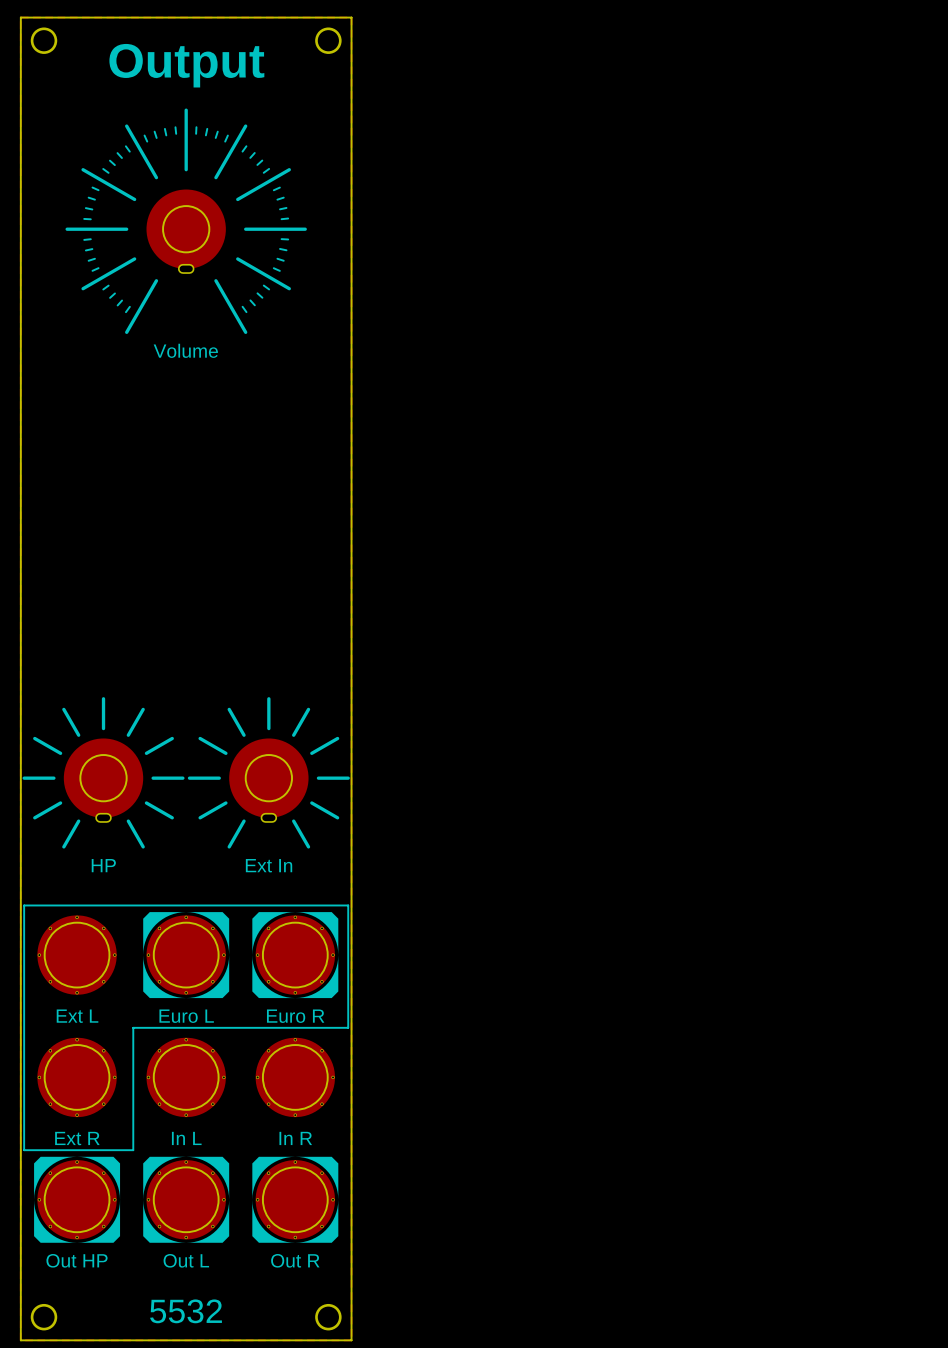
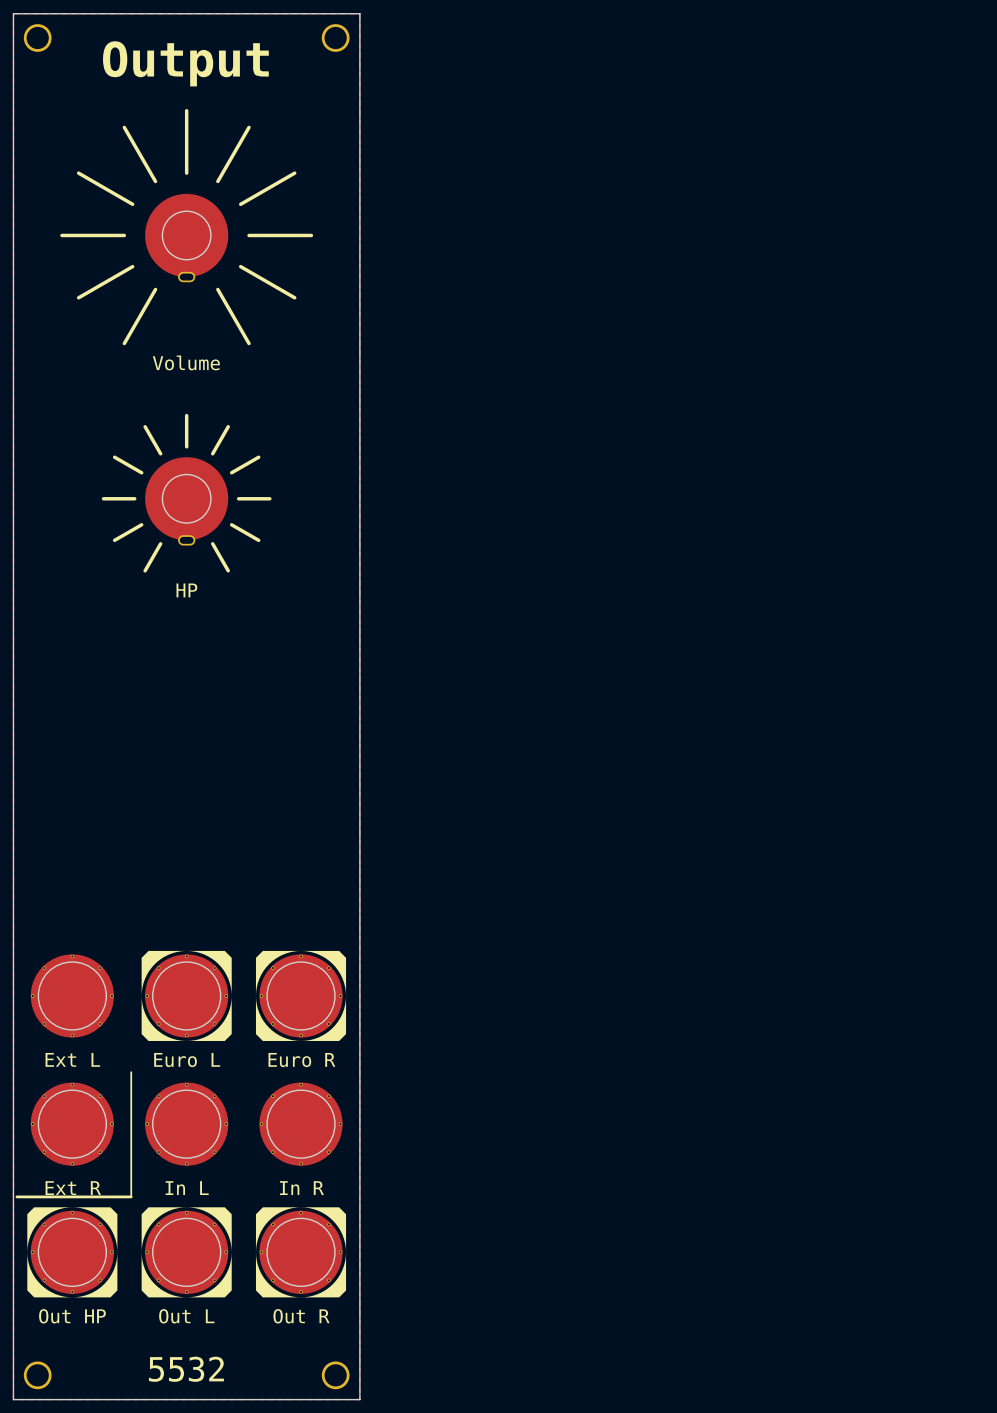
part footprint: [65, 108, 307, 334] -> [60, 109, 314, 346]
part: none -> HP (186, 493)
part: HP (103, 772) -> none
part: Ext In (268, 772) -> none
line: (133, 1027) (348, 1027) (348, 905) (24, 905) (24, 1150) (133, 1150) (133, 1146) -> (16, 1196) (131, 1196)

